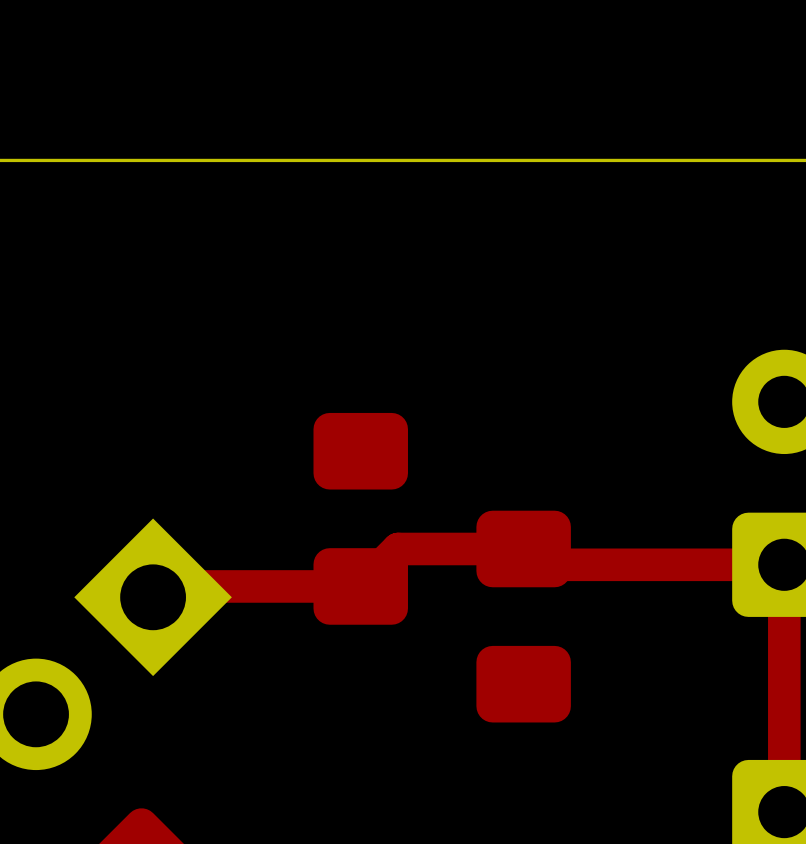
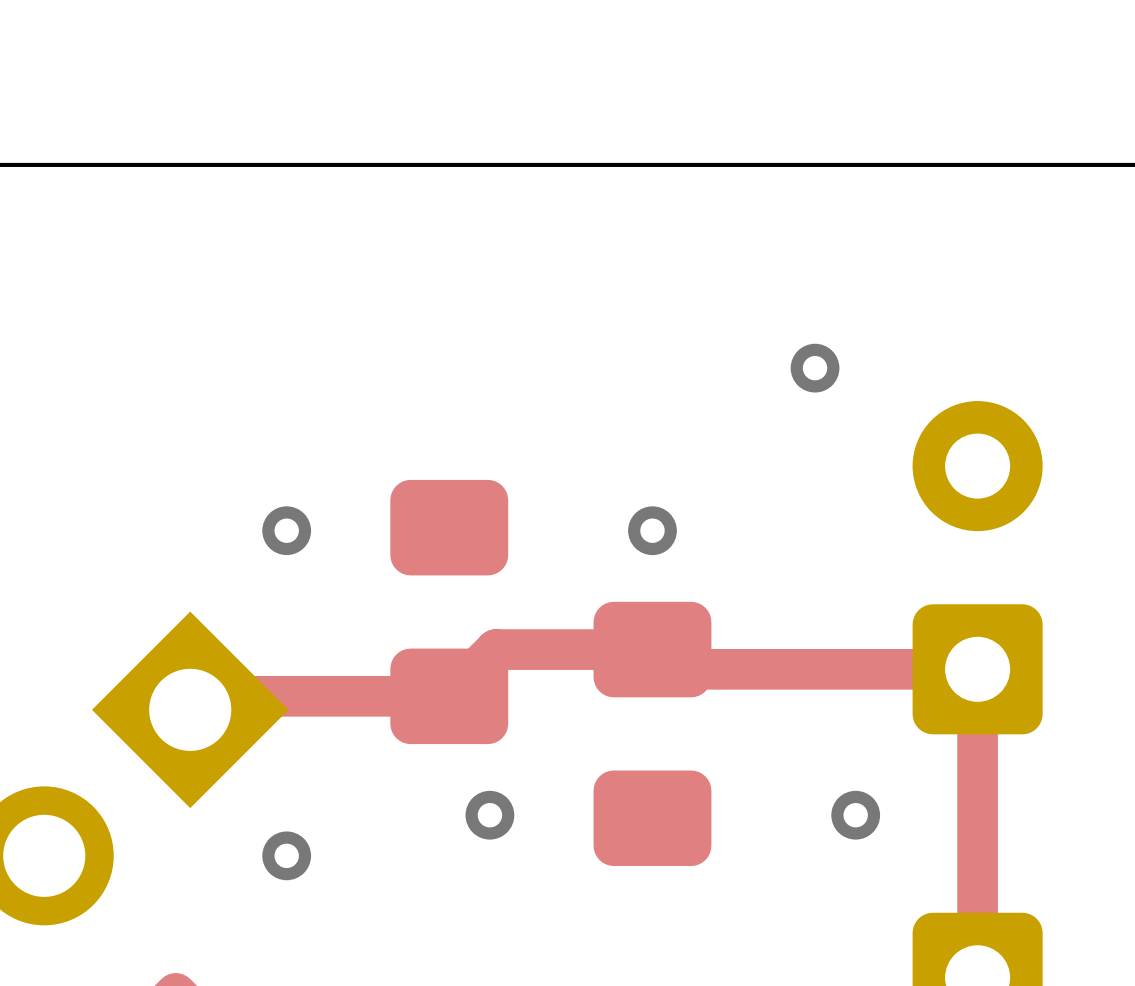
via: none -> (815, 368)
via: none -> (286, 530)
via: none -> (652, 530)
via: none -> (489, 815)
via: none -> (855, 815)
via: none -> (286, 855)

